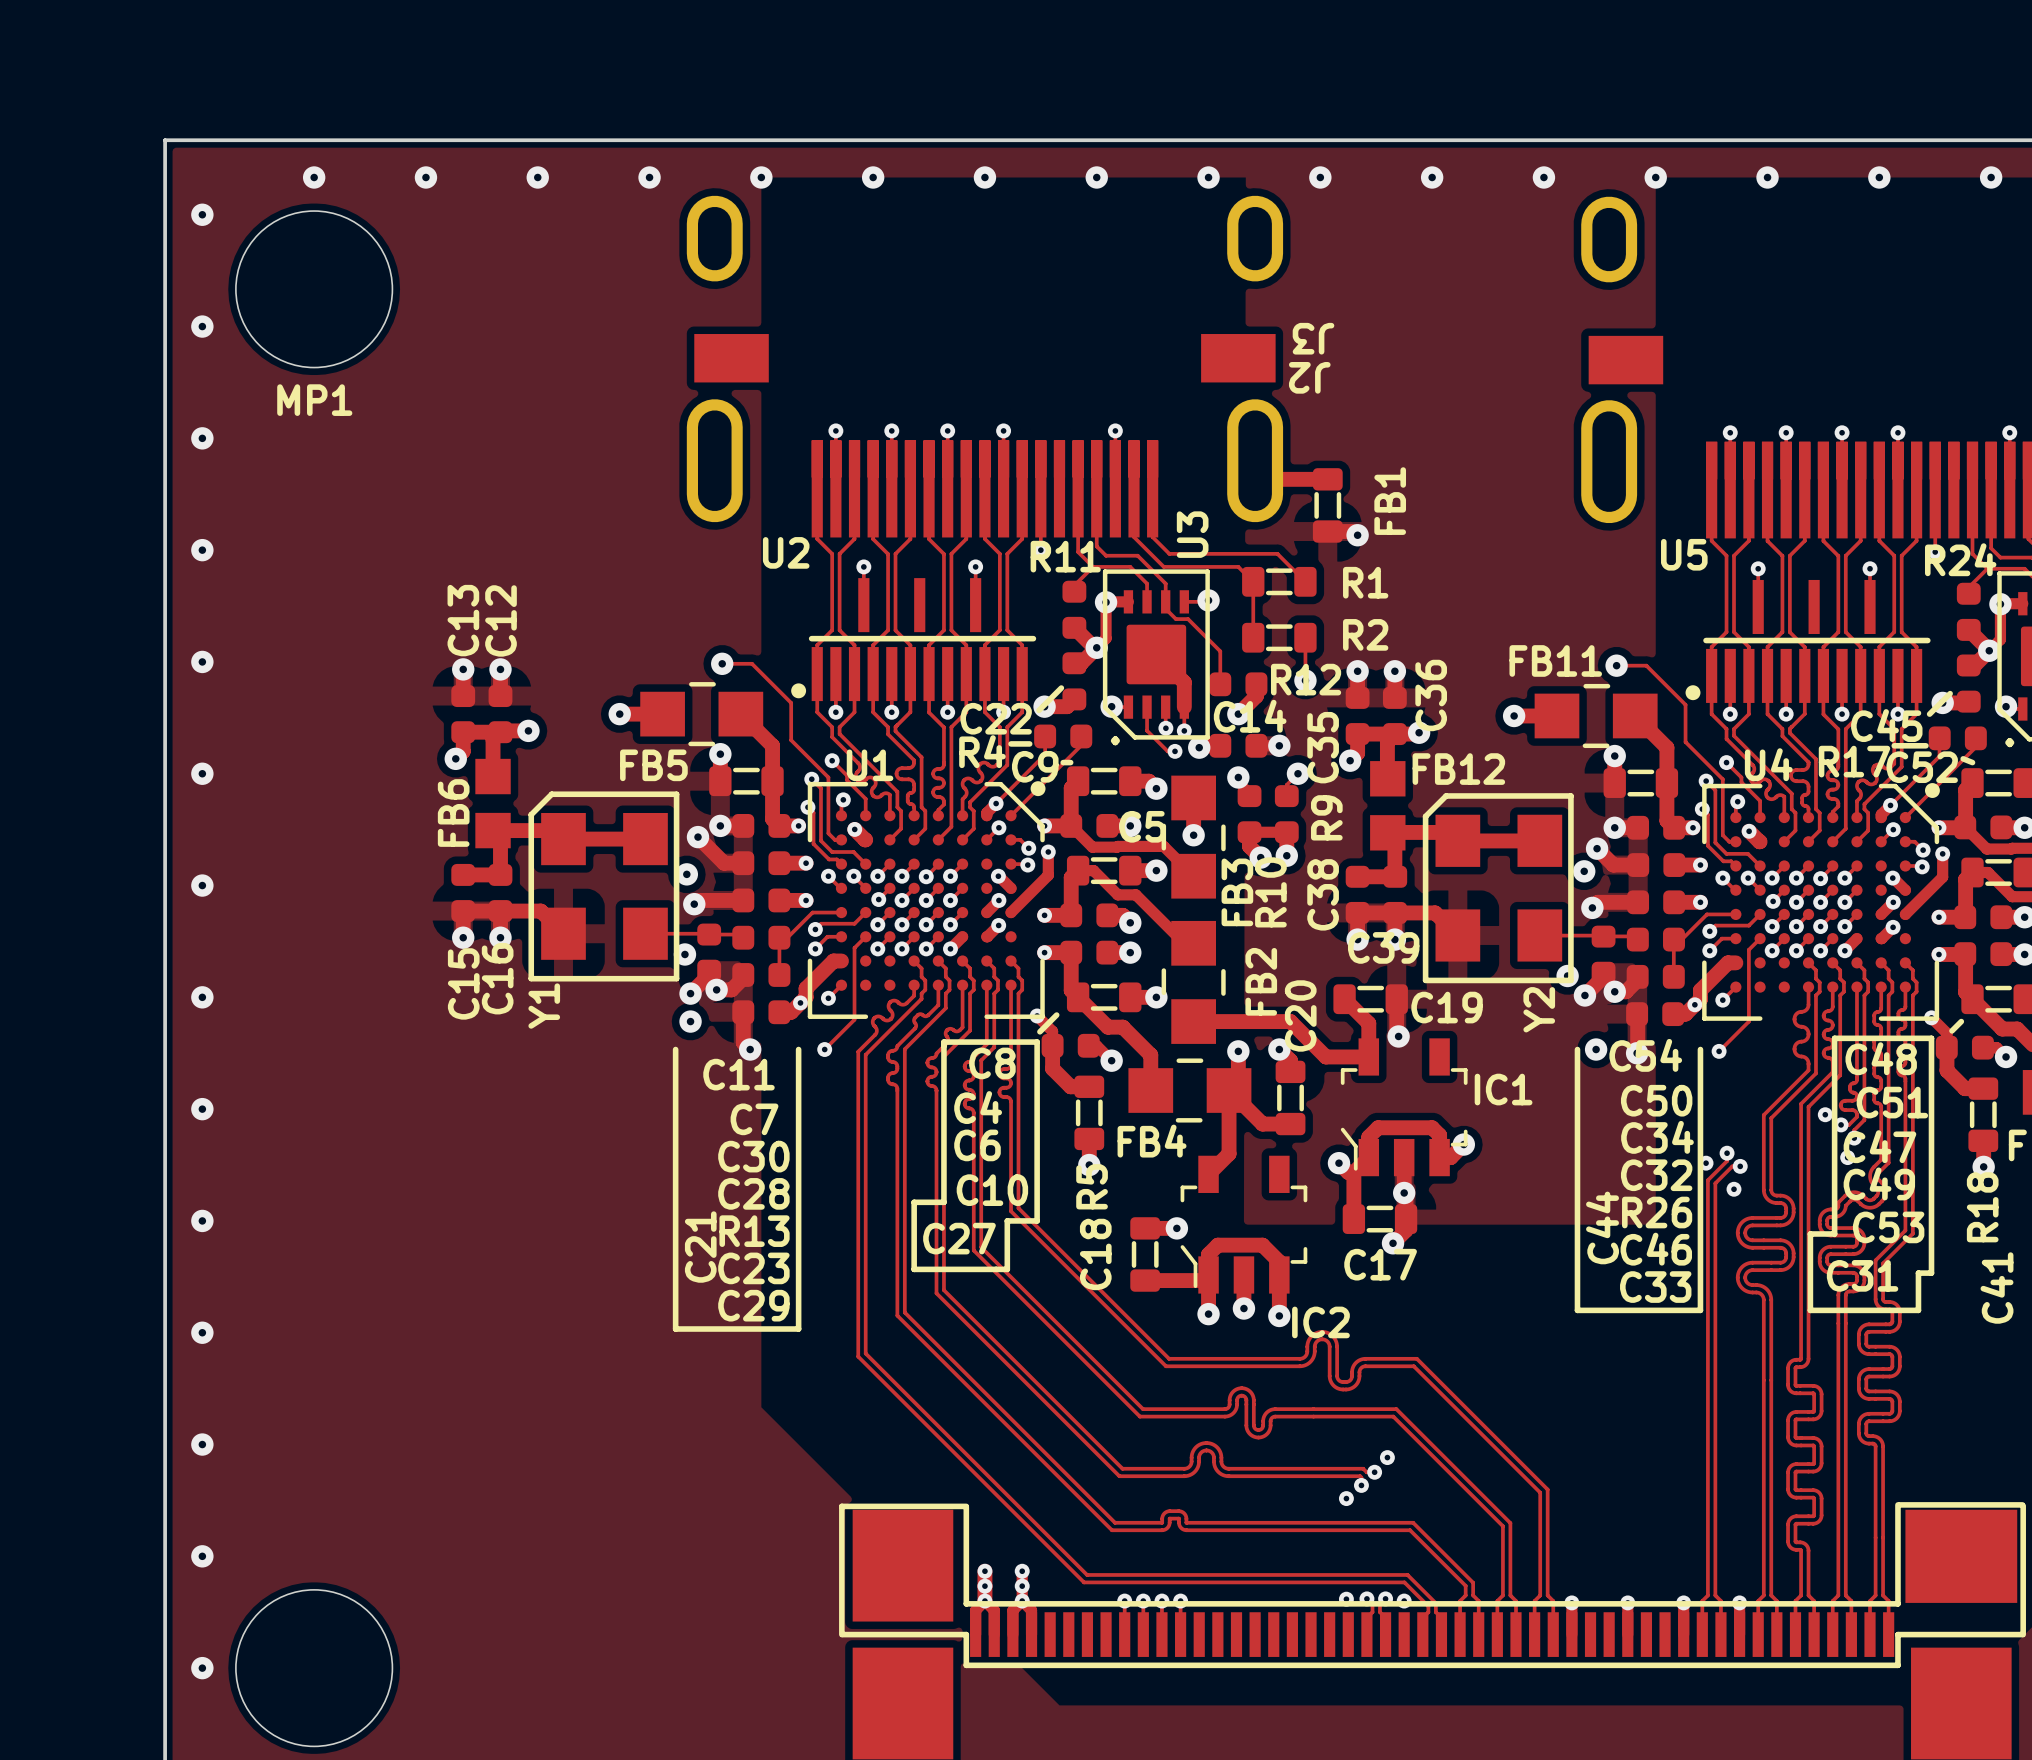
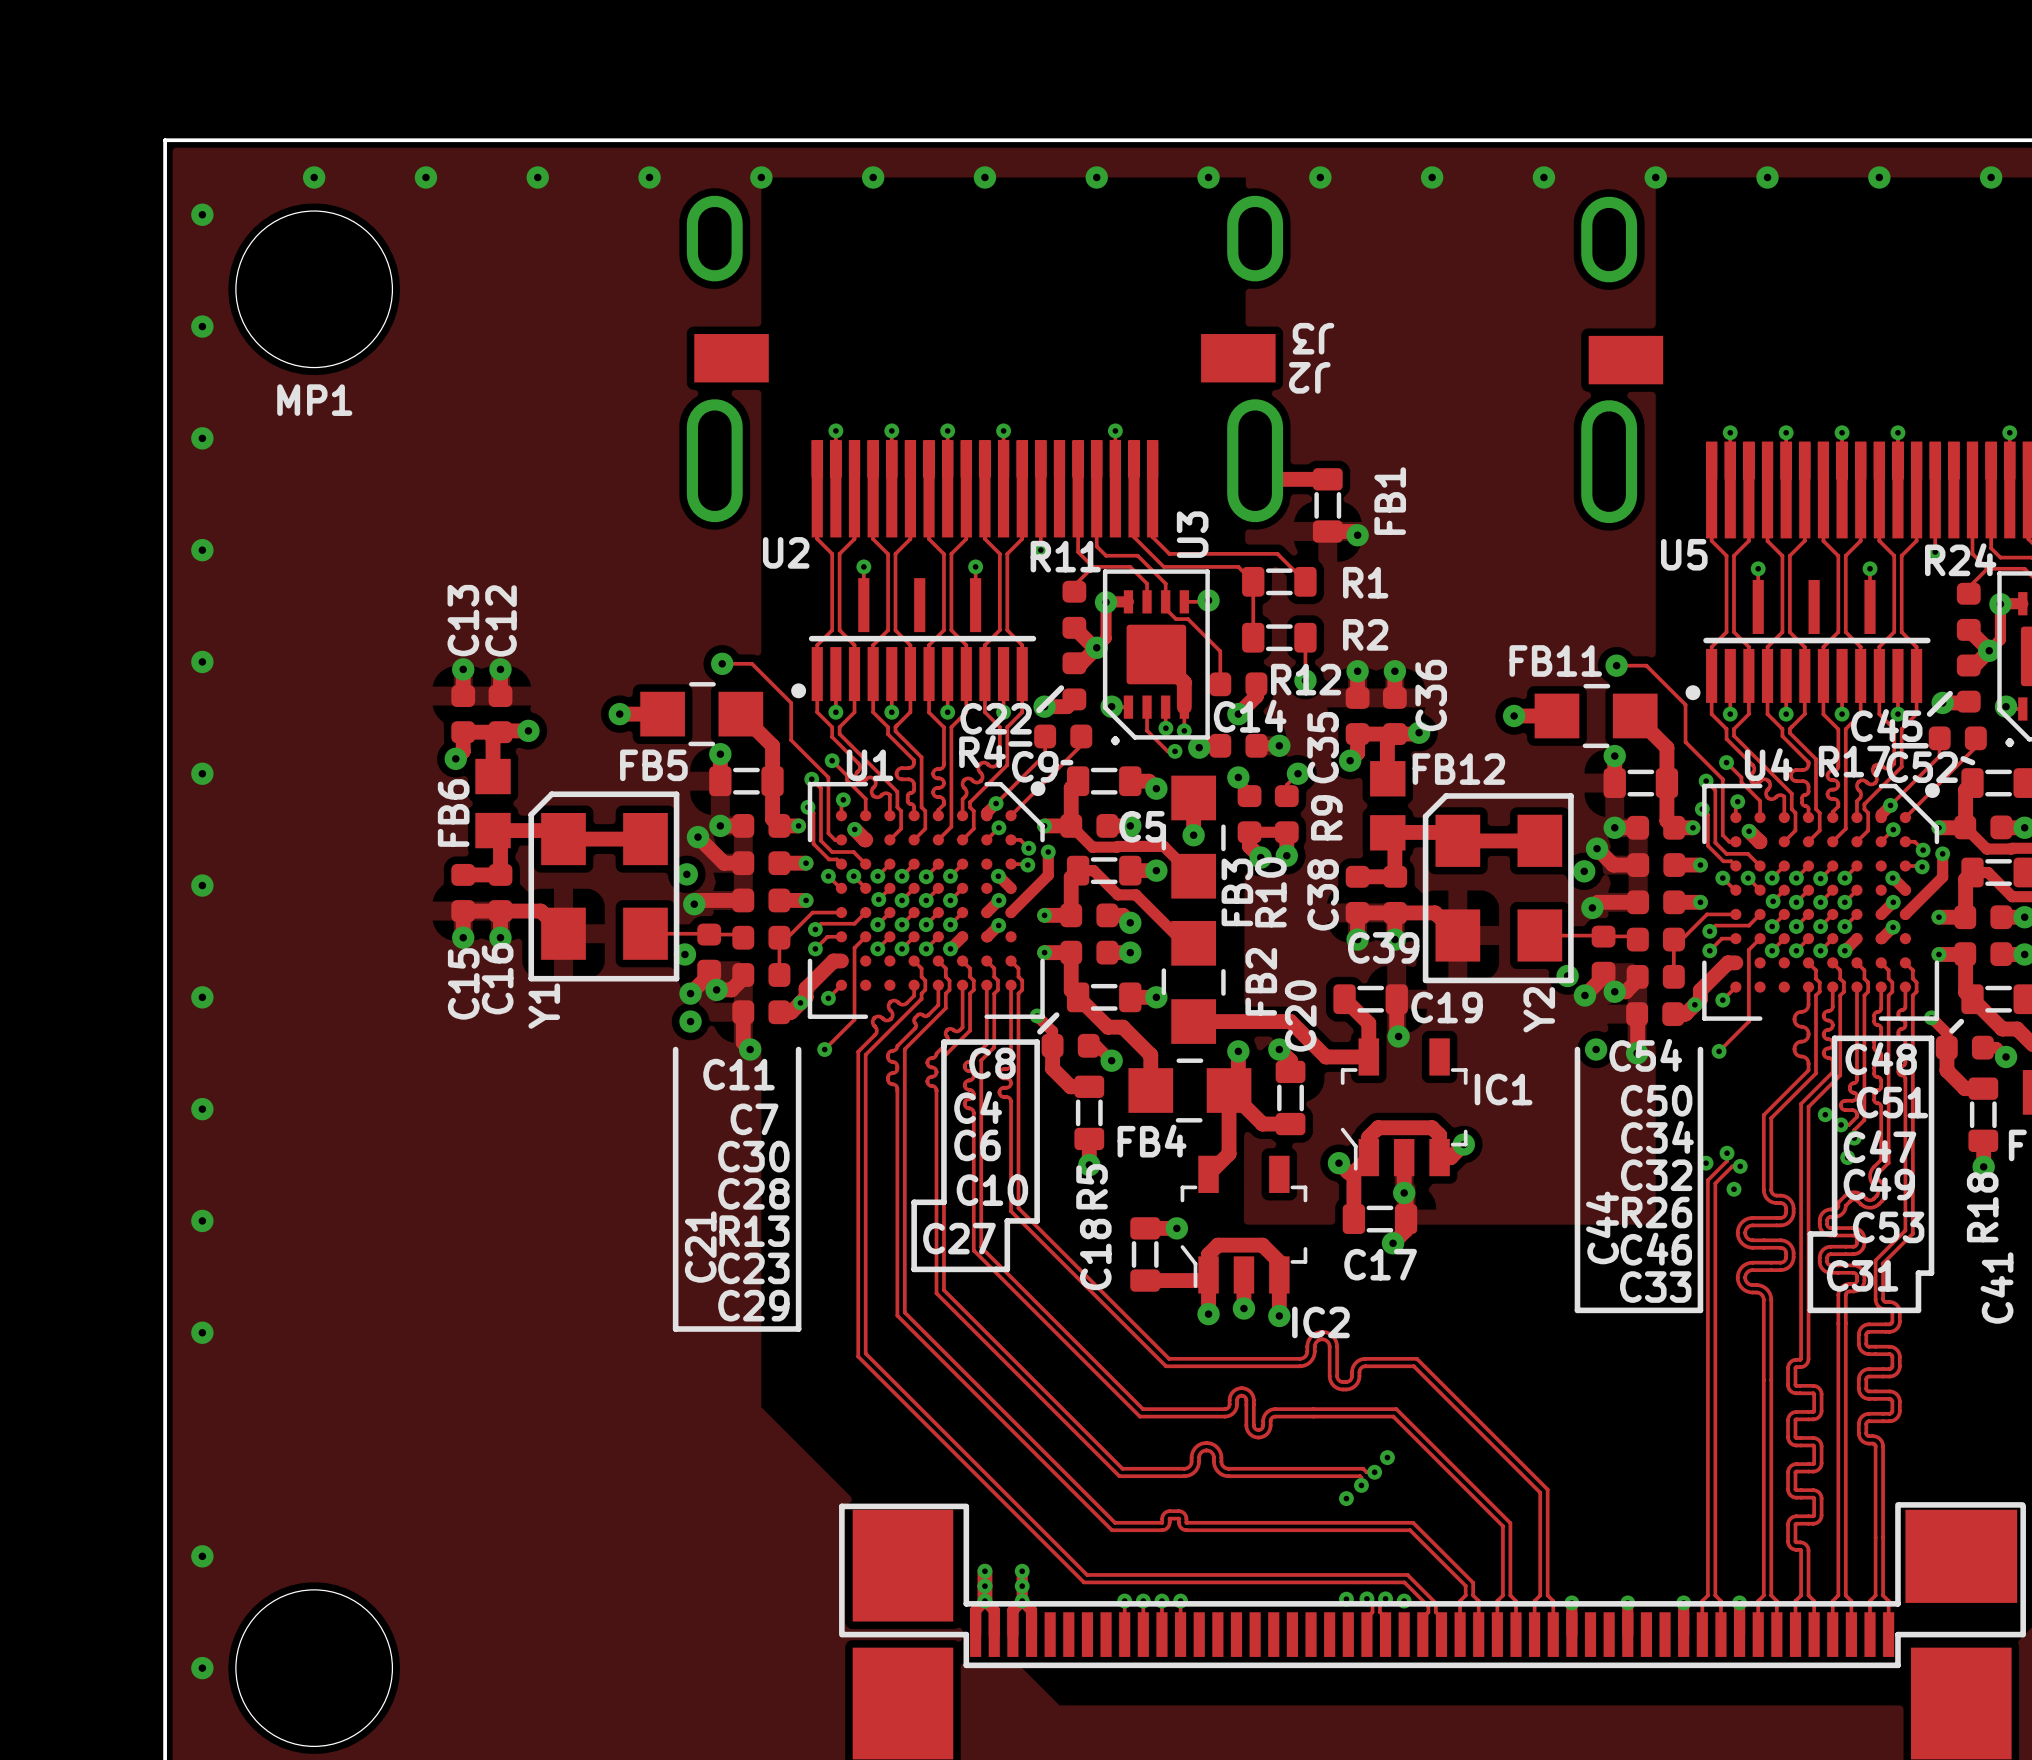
via: (202, 1444) -> none

